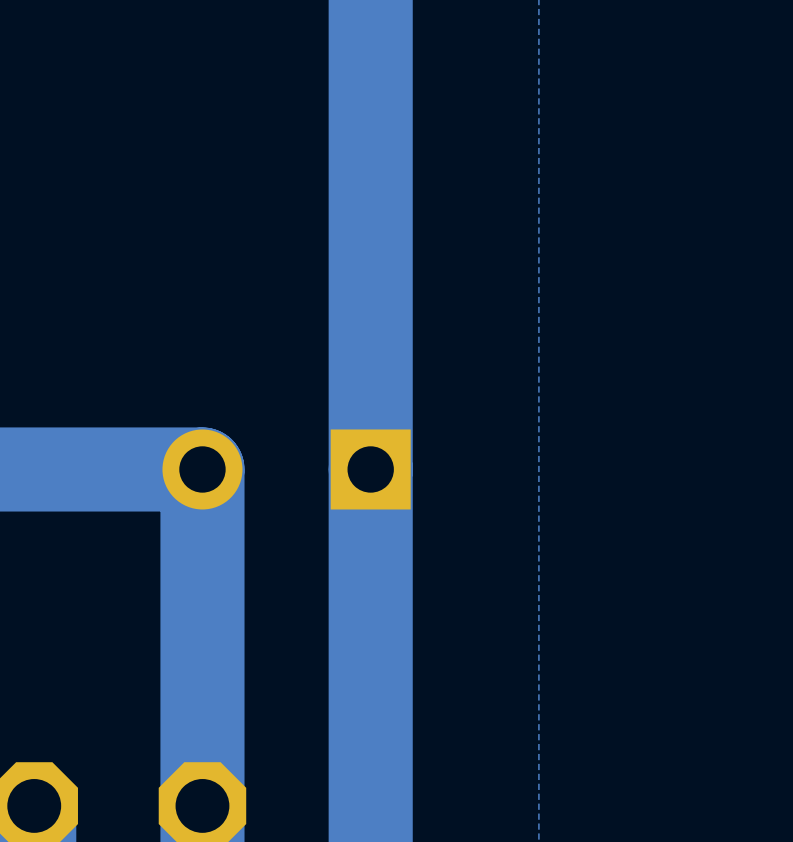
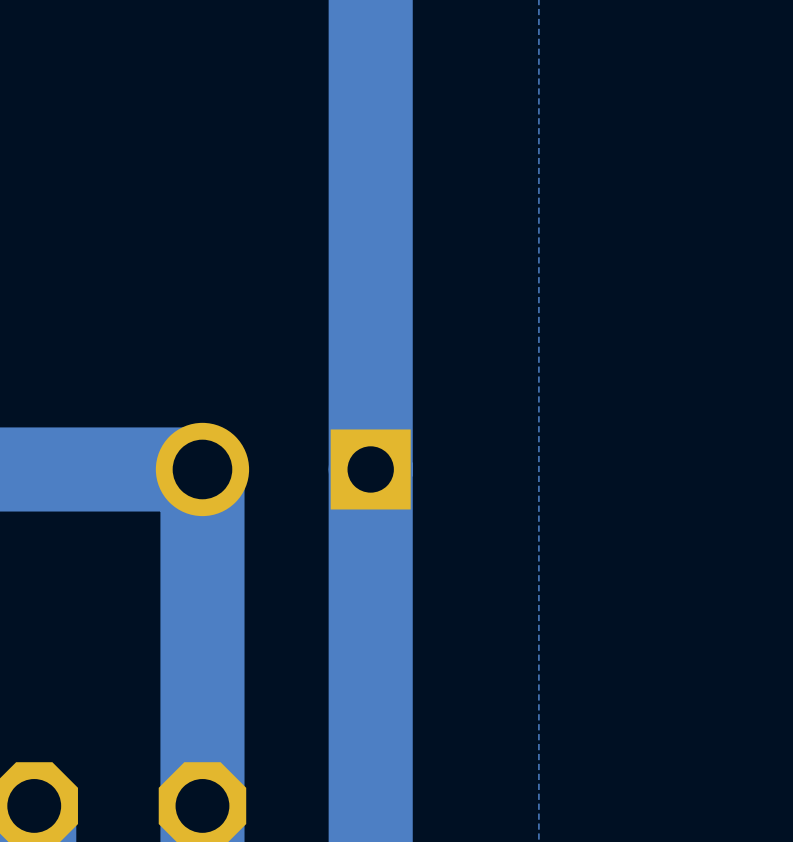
part footprint: [162, 429, 411, 510] -> [155, 422, 411, 517]

